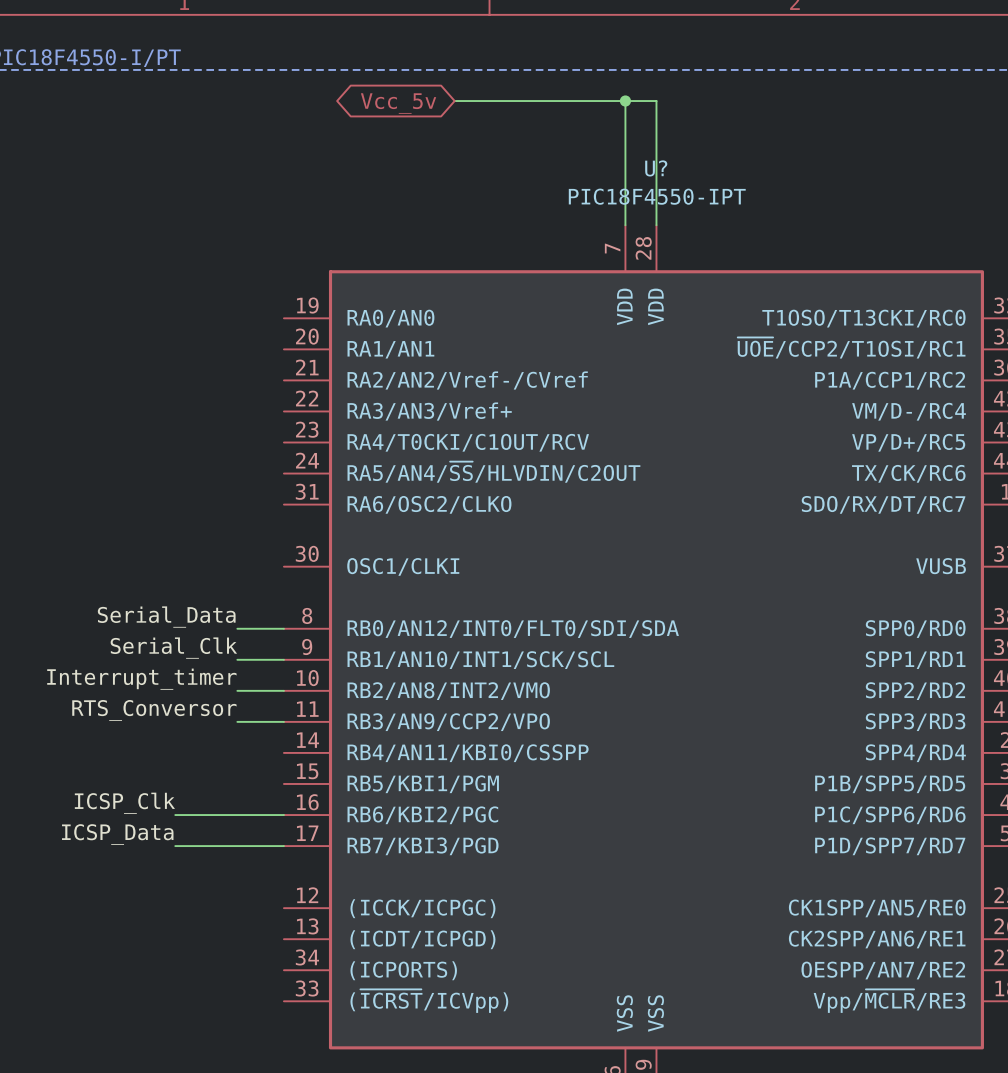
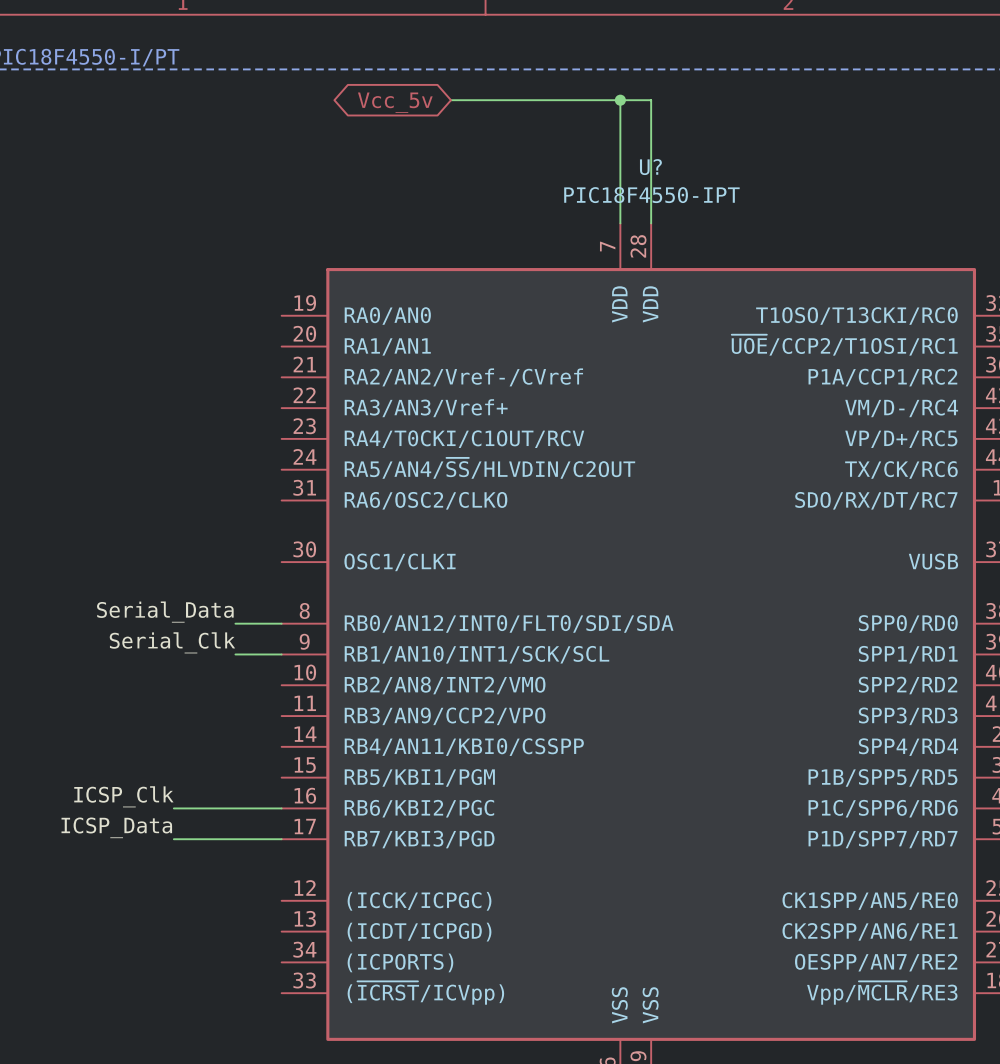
label: Interrupt_timer (141, 679) -> none
wire: (237, 690) (283, 690) -> none
label: RTS_Conversor (154, 710) -> none
wire: (237, 721) (283, 721) -> none

